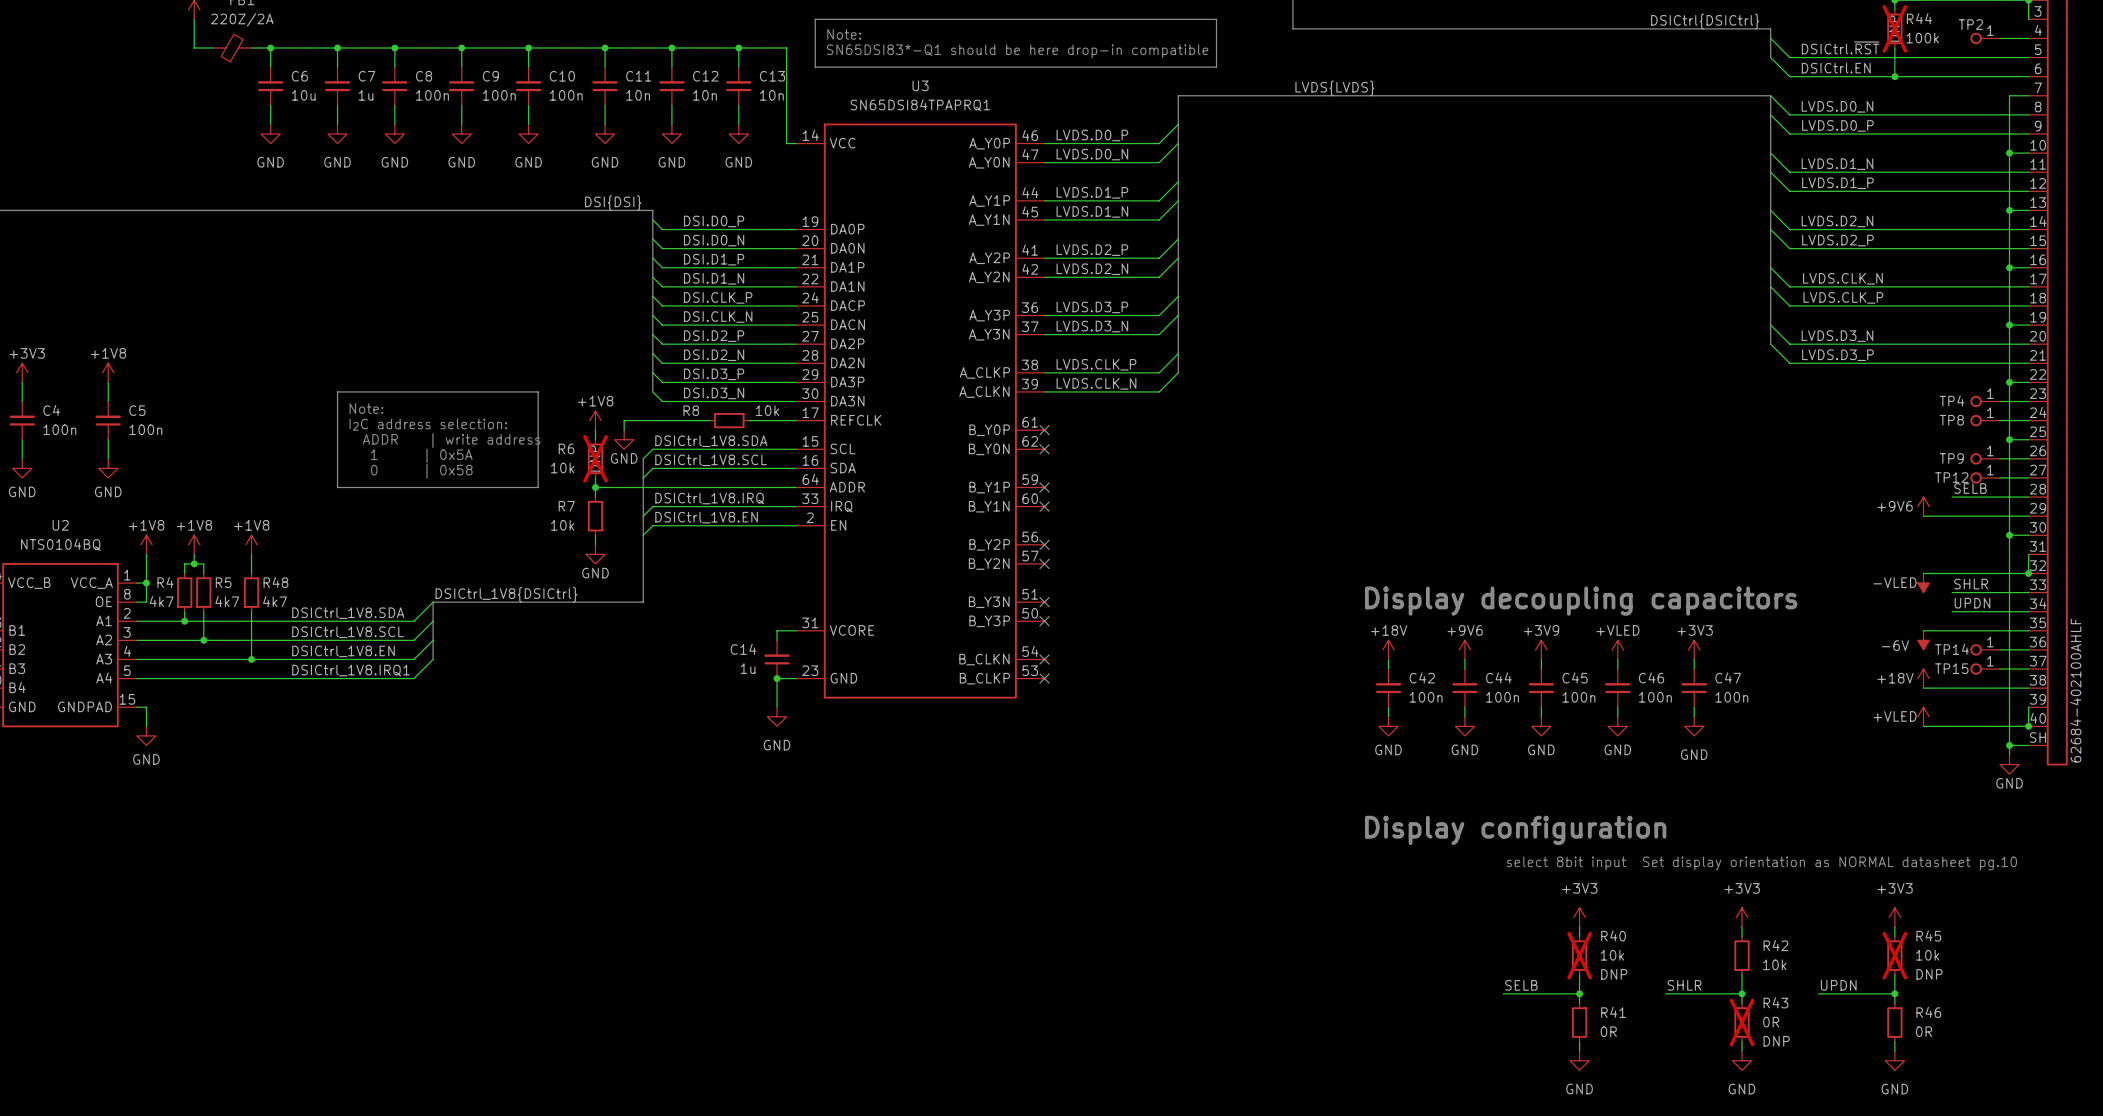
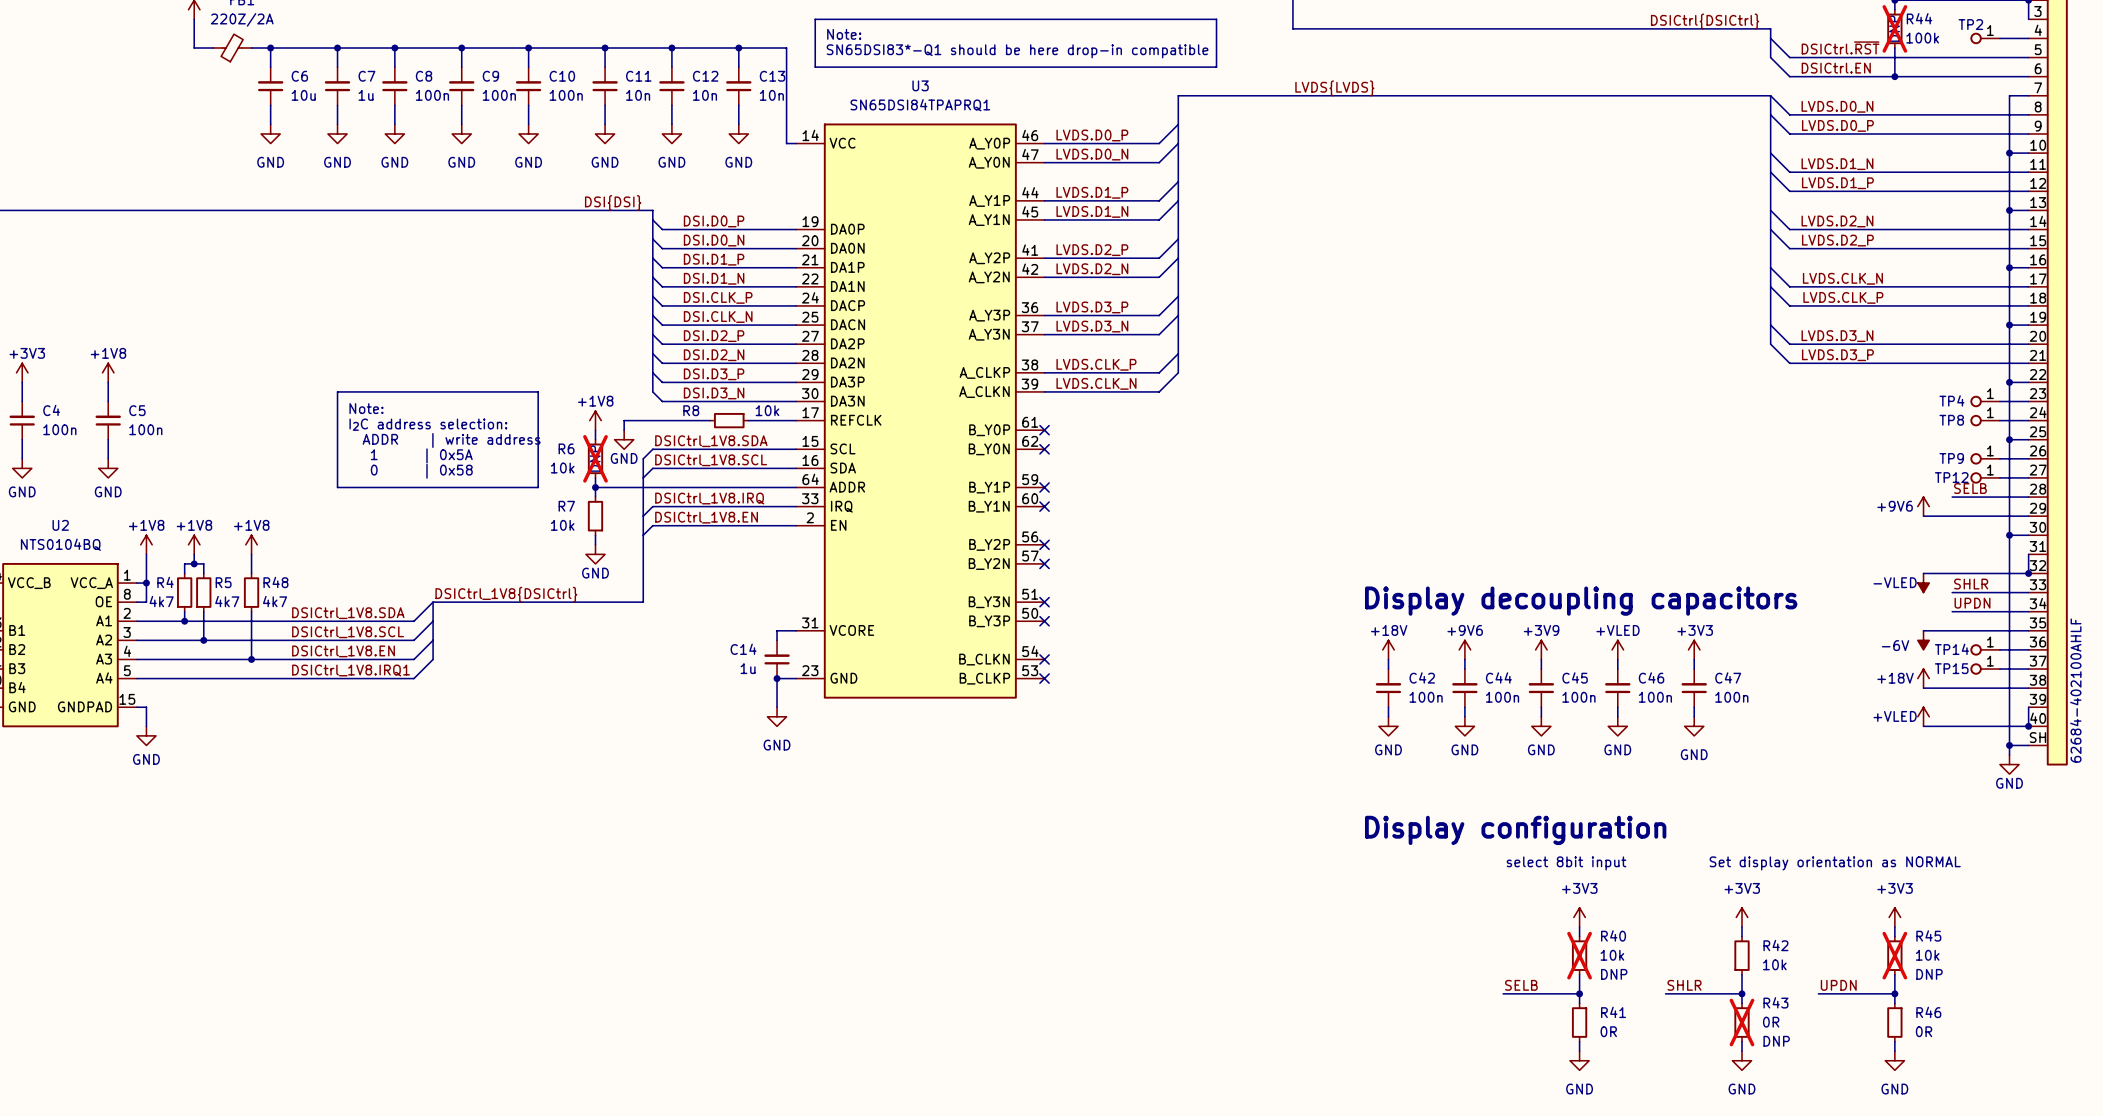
text: Set display orientation as NORMAL datasheet pg.10 (1829, 863) -> Set display orientation as NORMAL (1835, 863)

